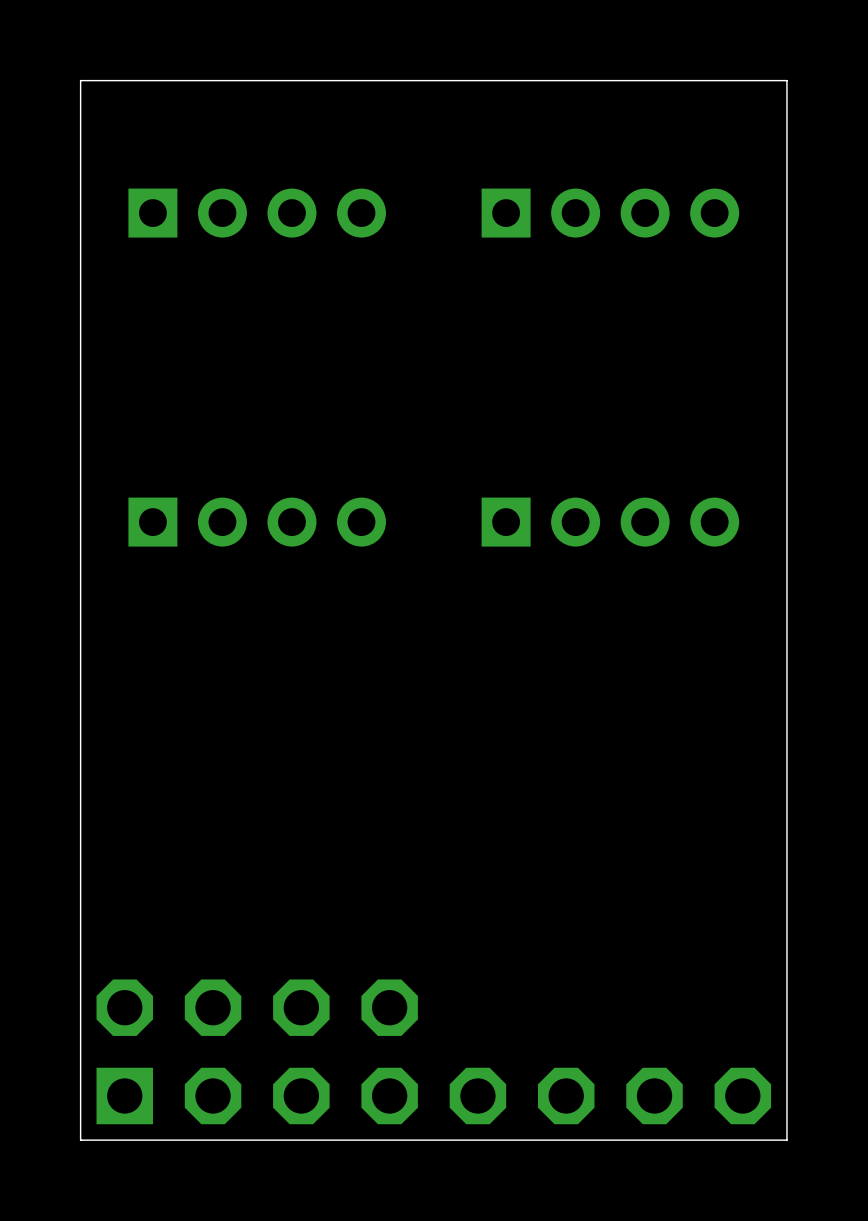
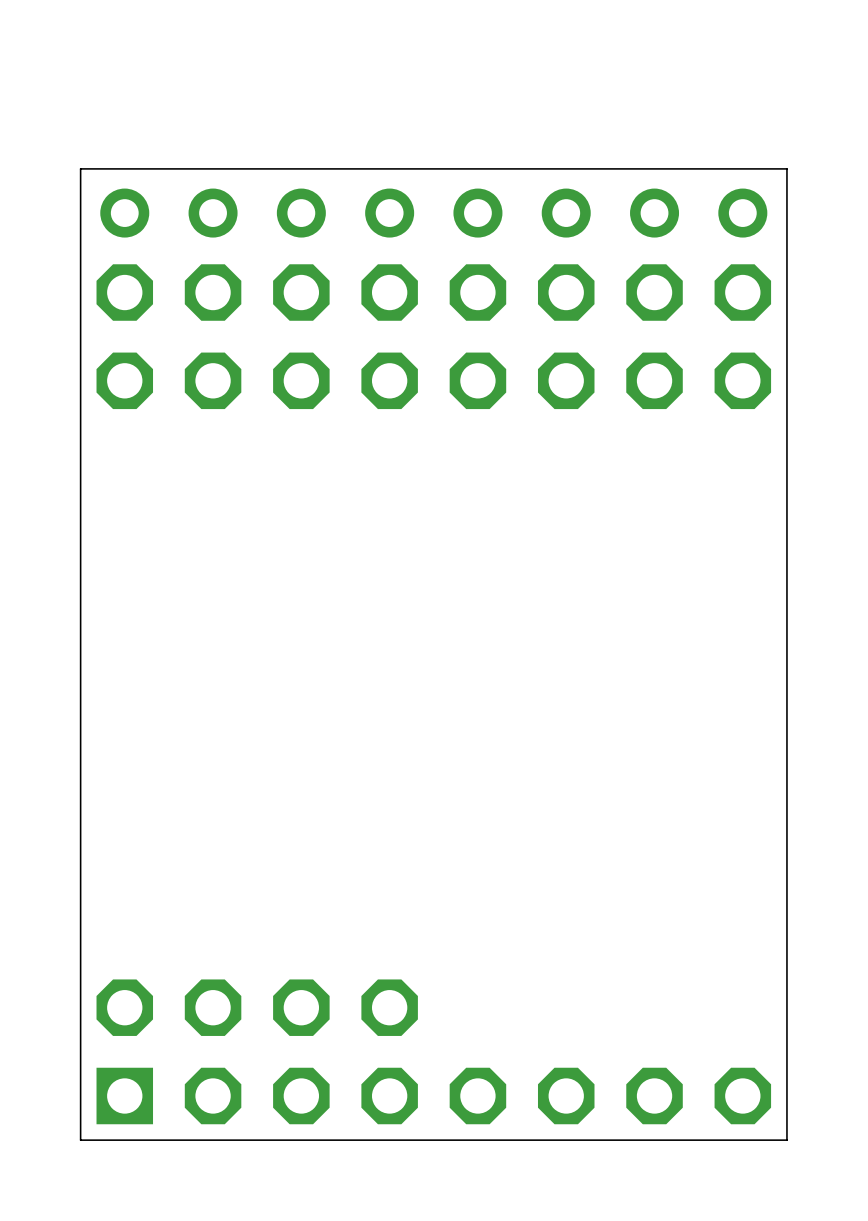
board edge: (786, 168) (786, 80) (80, 80) (80, 168) -> (786, 168) (80, 168)
part: (257, 213) -> none
part: none -> (433, 213)
part: (610, 213) -> none
part: none -> (433, 336)
part: (257, 522) -> none
part: (610, 522) -> none

